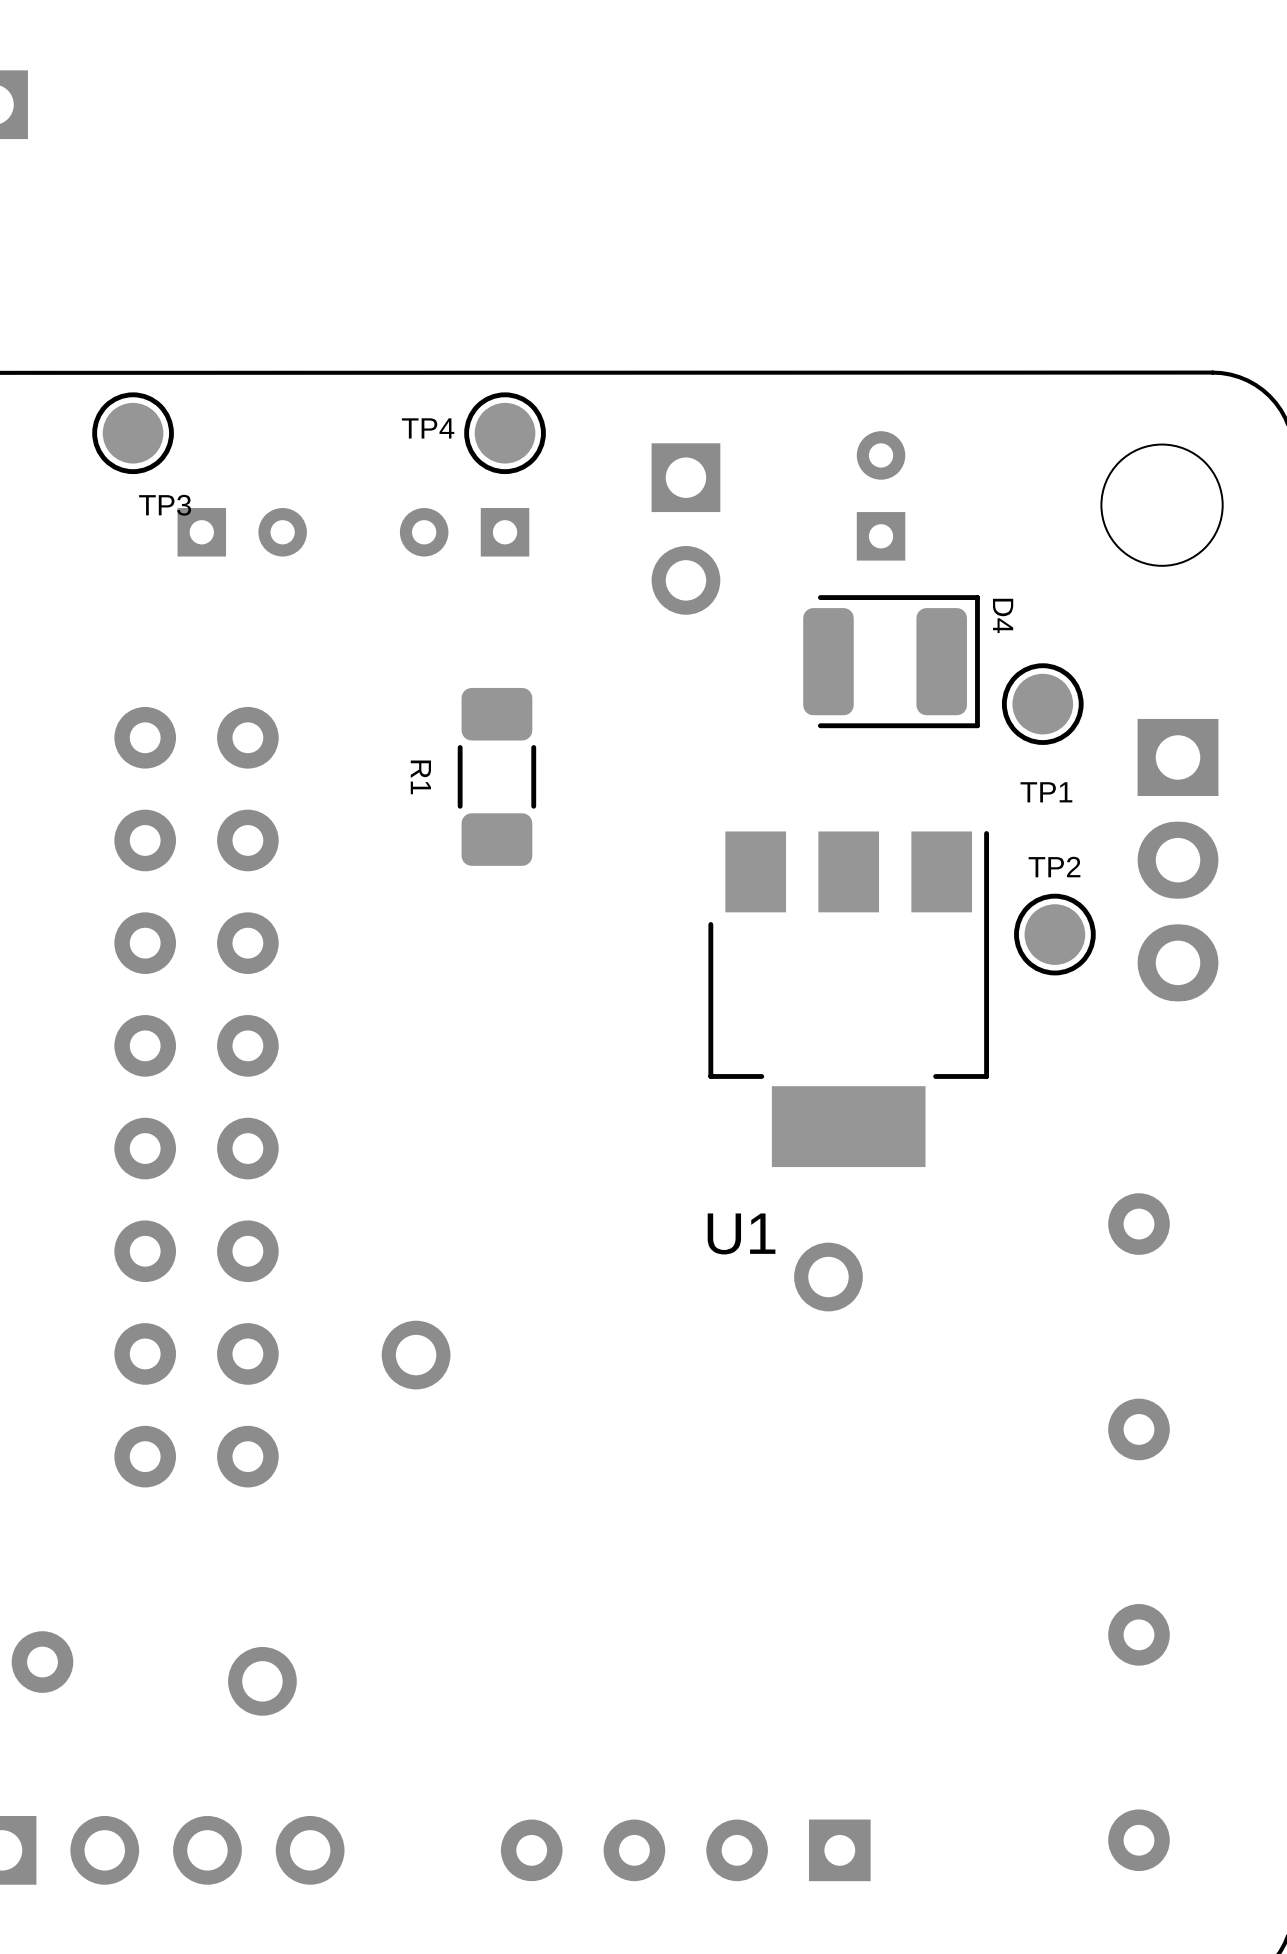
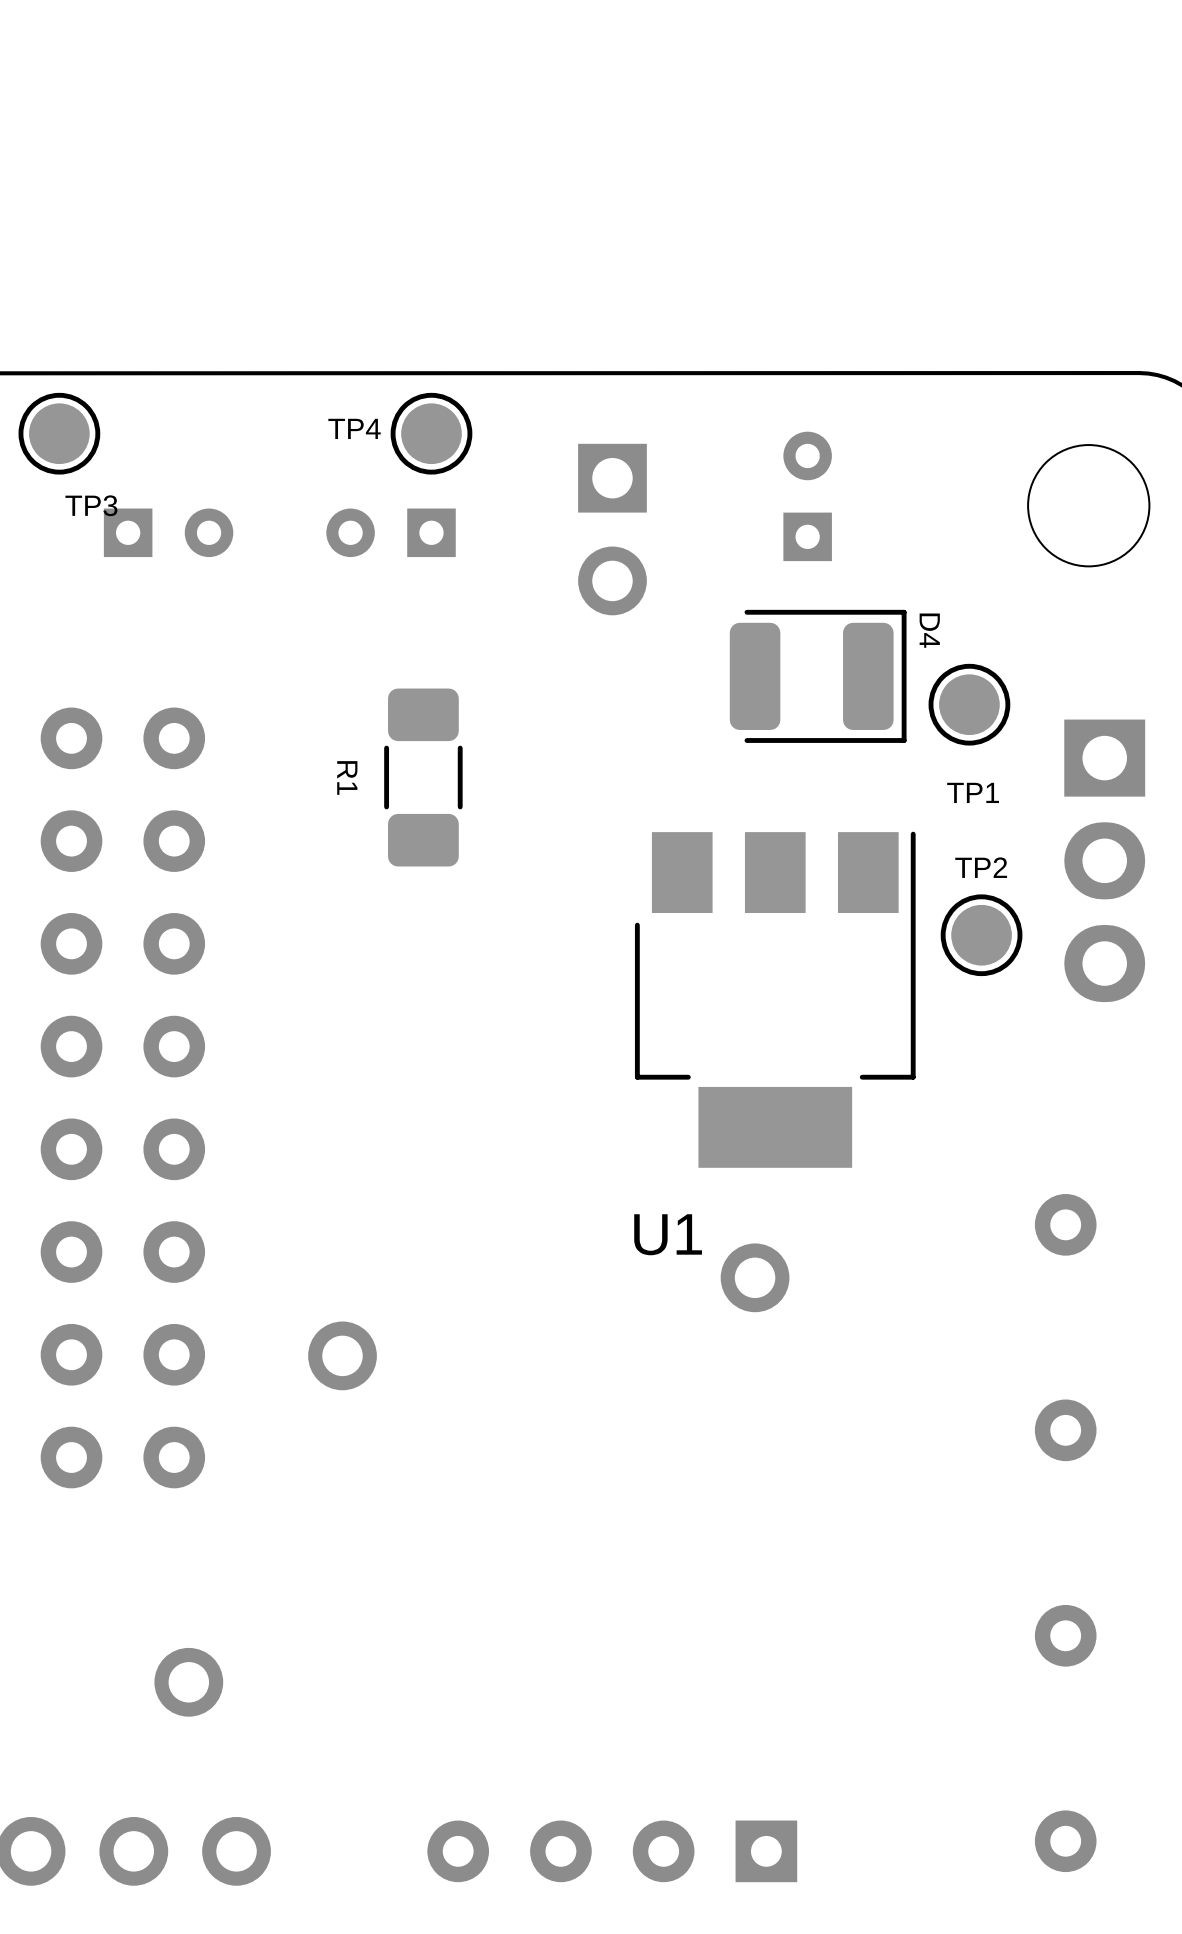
D4 position: (891, 661) -> (818, 676)

